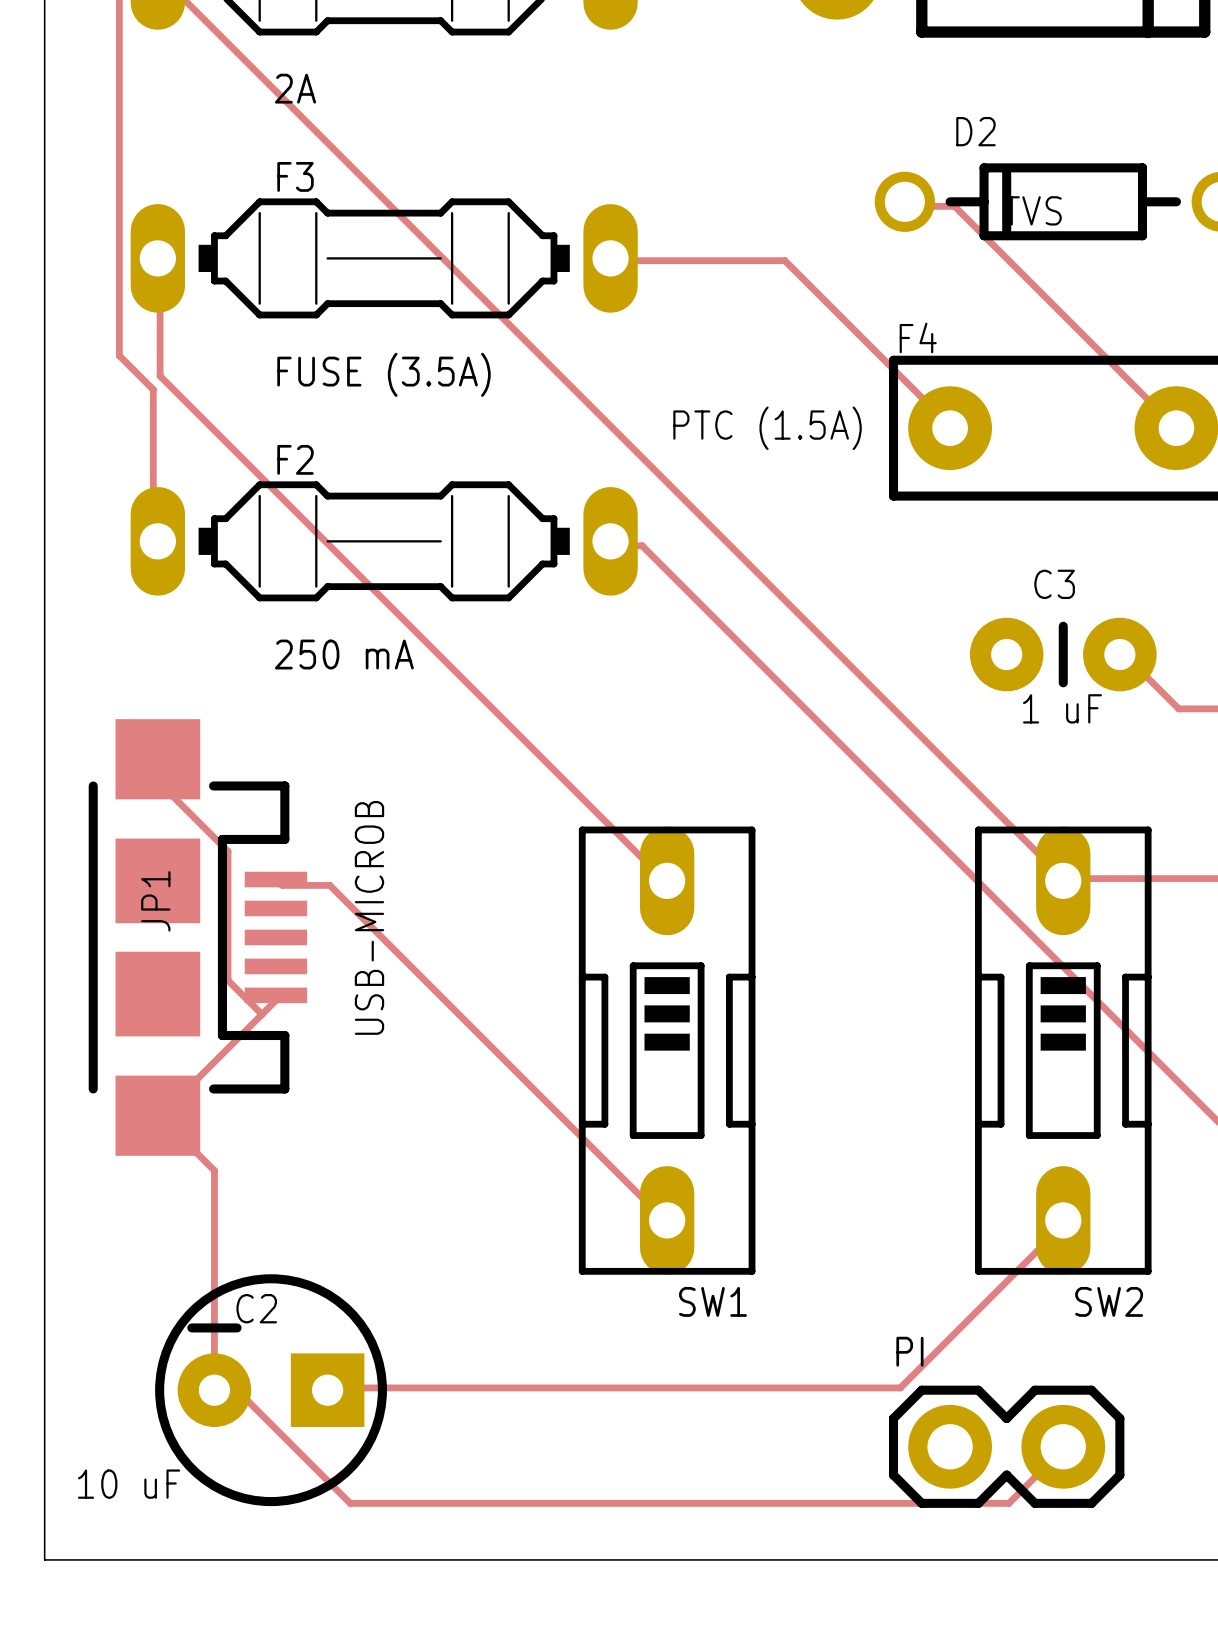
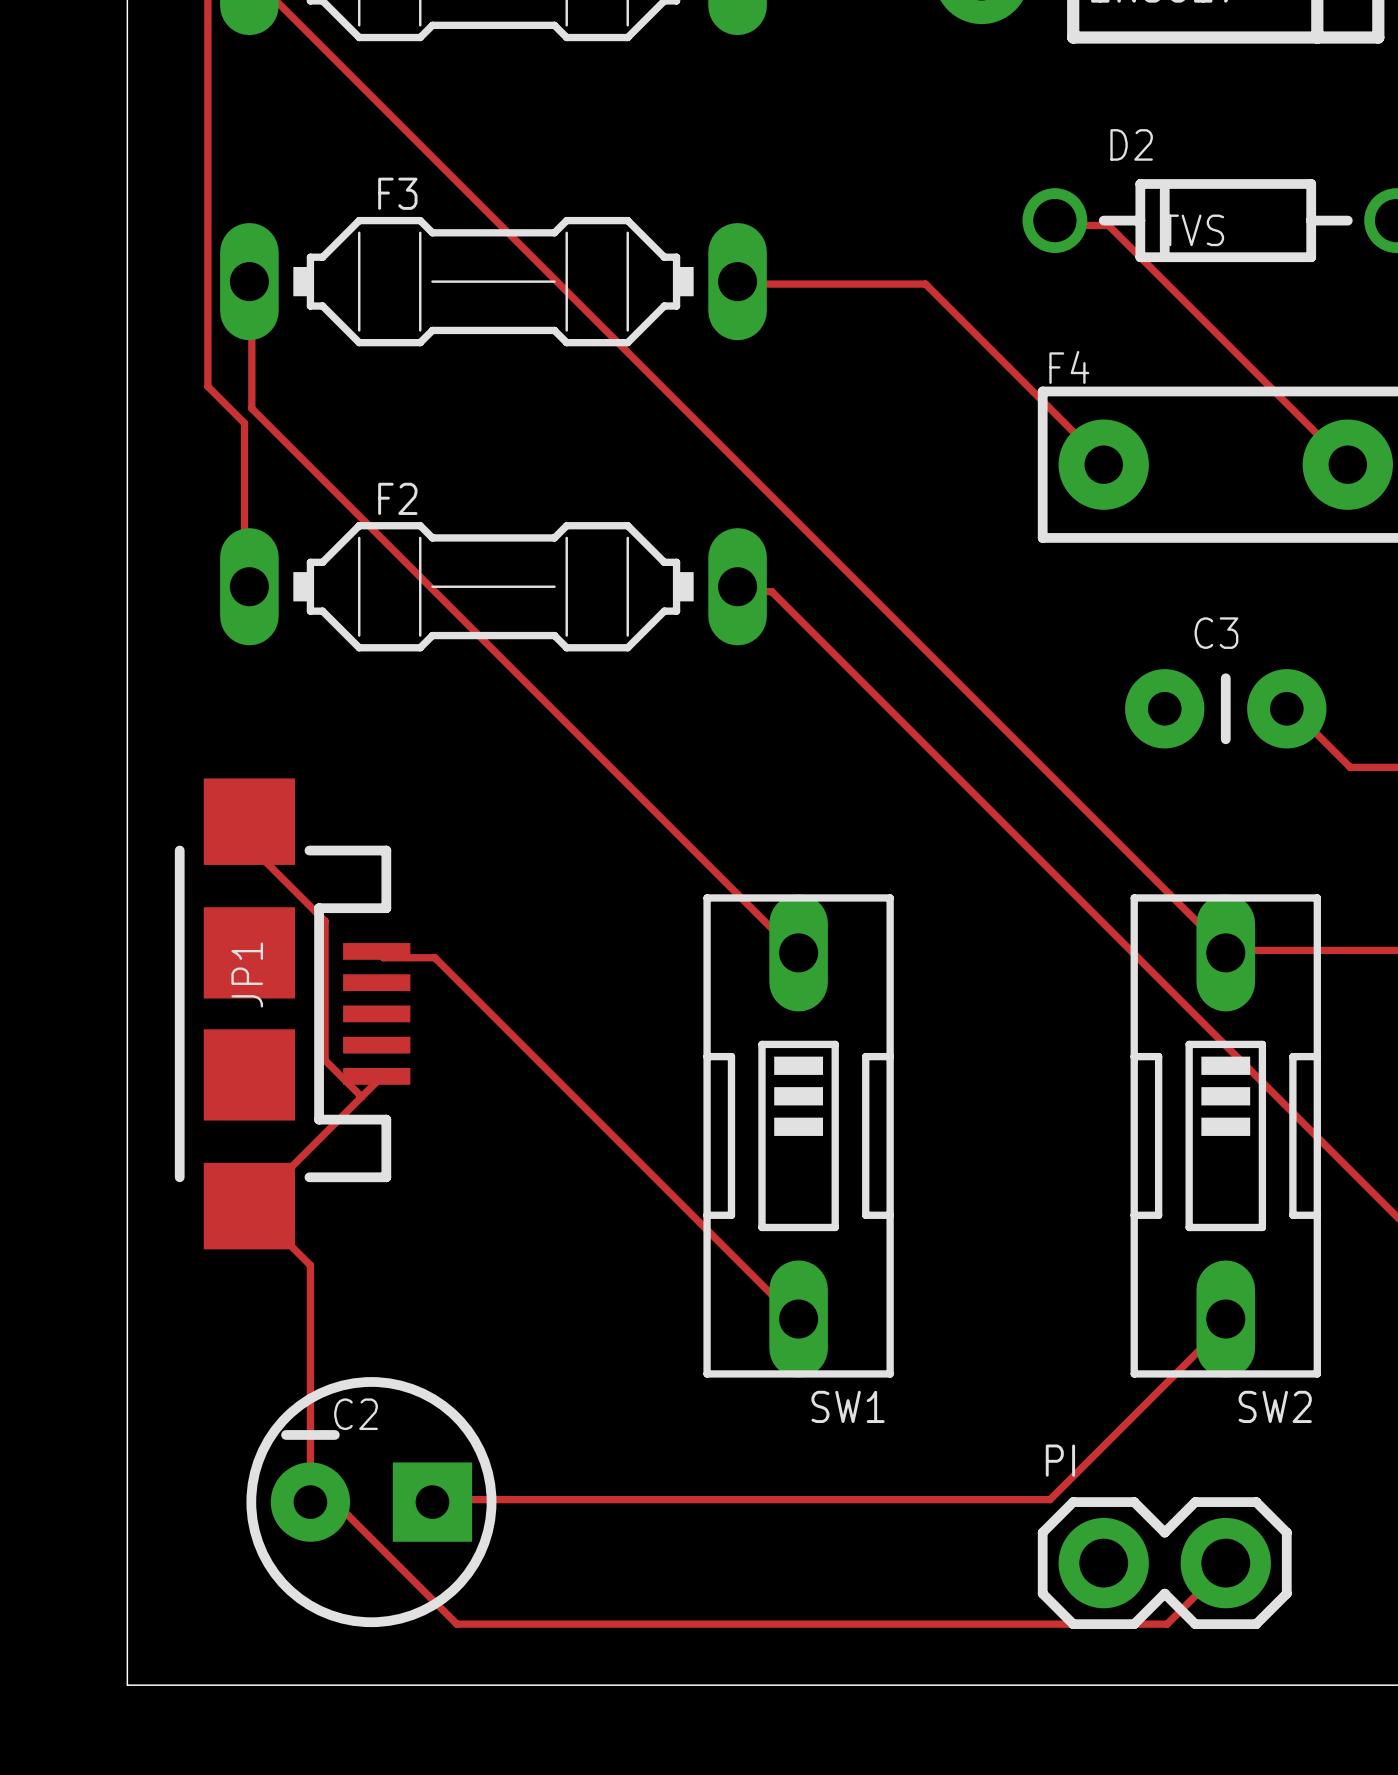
part value: 2A (295, 88) -> none
F3 value: FUSE (3.5A) (383, 374) -> none
F4 value: PTC (1.5A) (767, 428) -> none
F2 value: 250 mA (344, 654) -> none
C3 value: 1 uF (1062, 708) -> none
JP1 value: USB-MICROB (369, 917) -> none
C2 value: 10 uF (129, 1484) -> none

